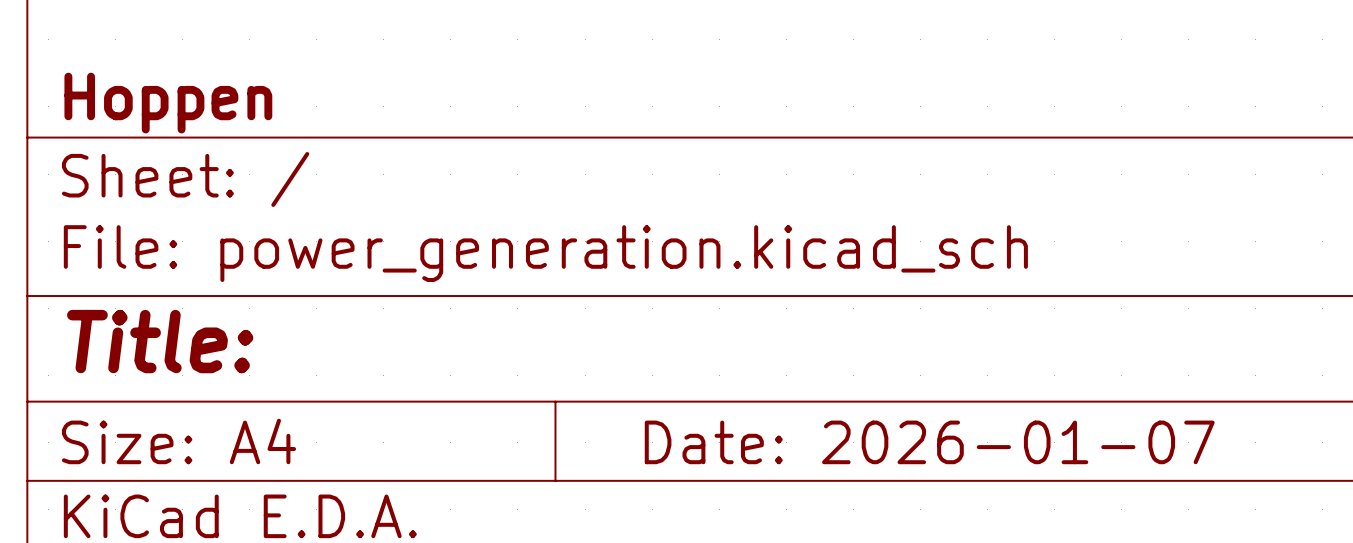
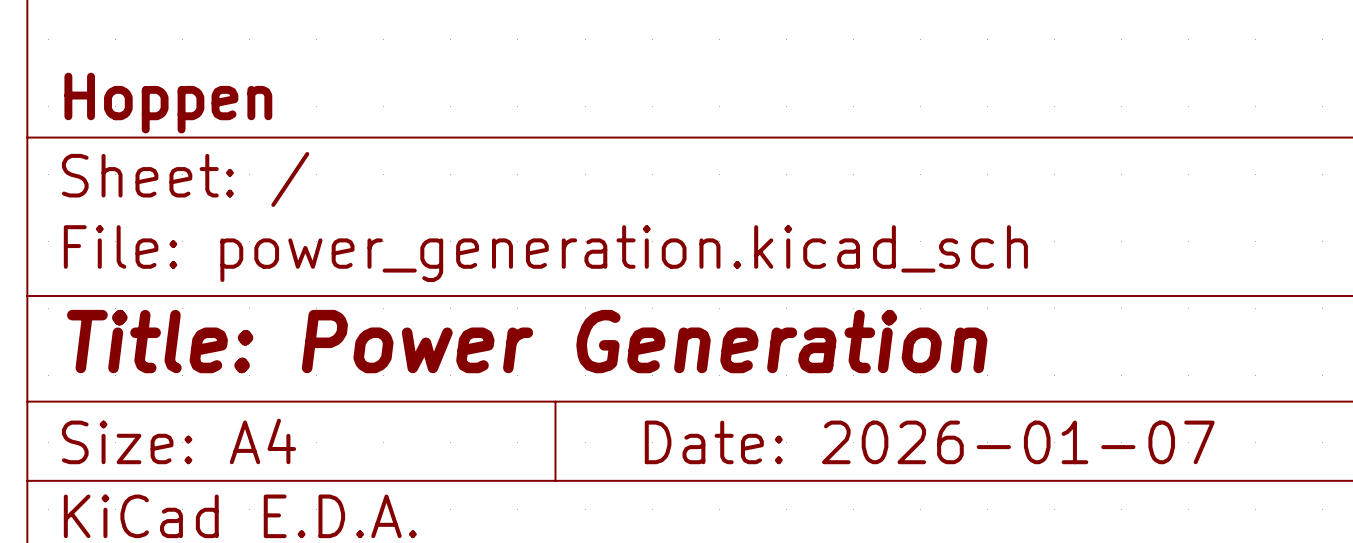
title block: Title: (160, 341) -> Title: Power Generation (527, 341)

